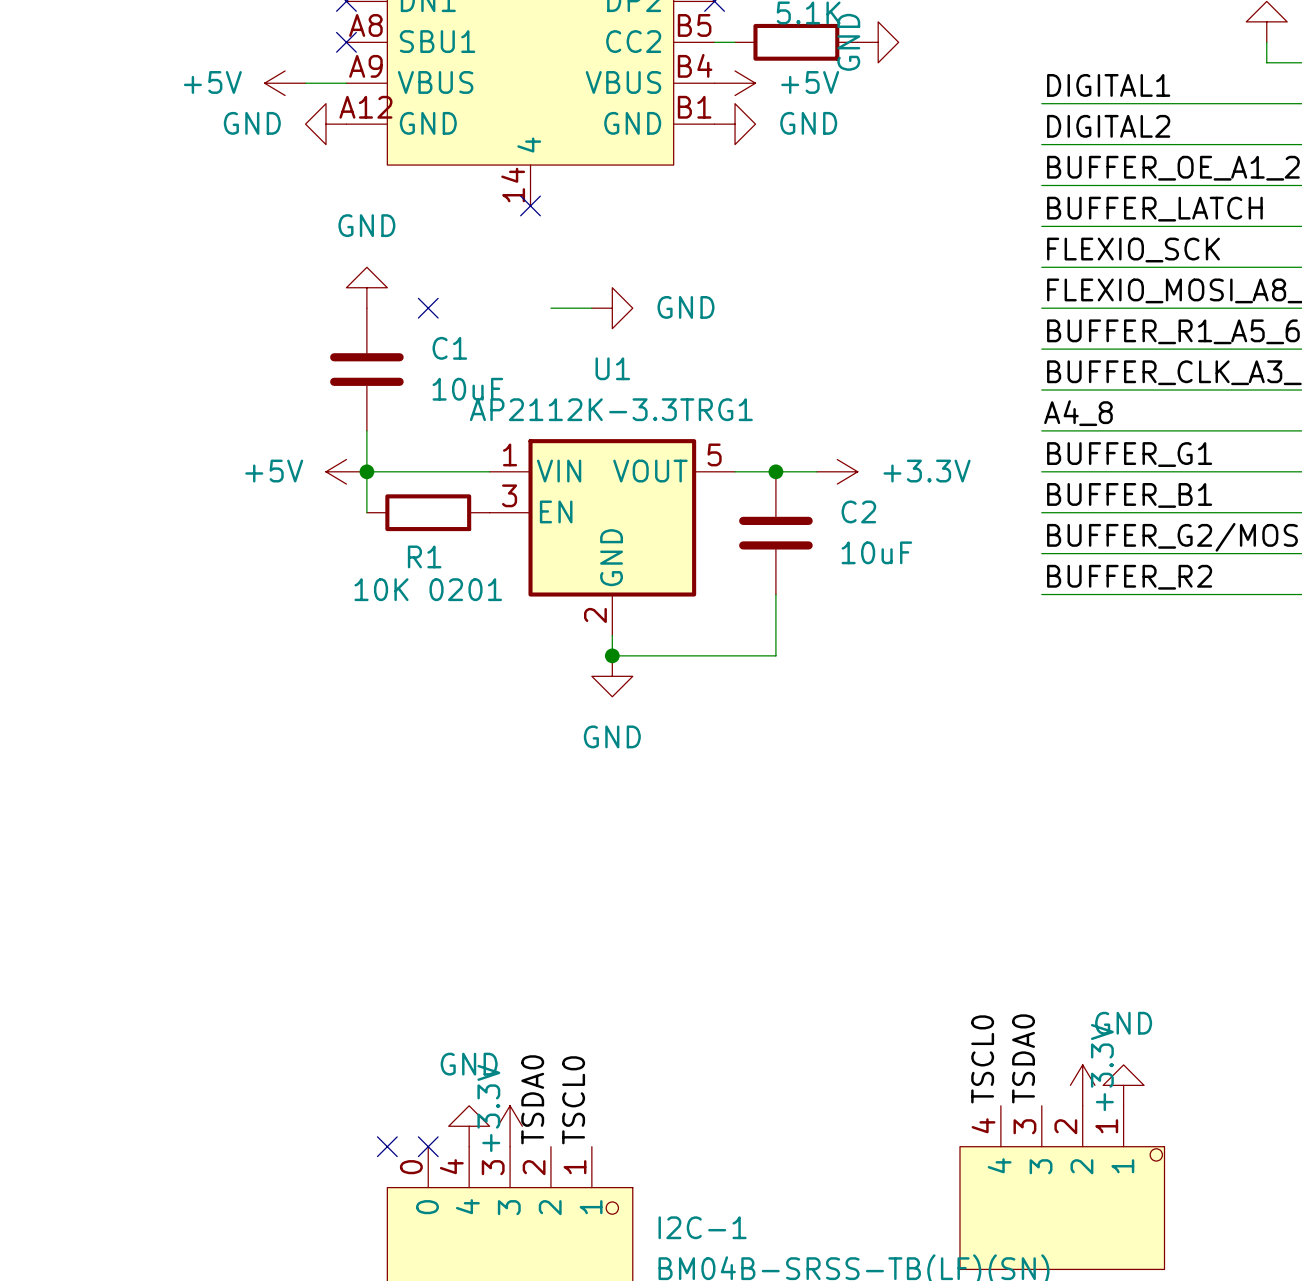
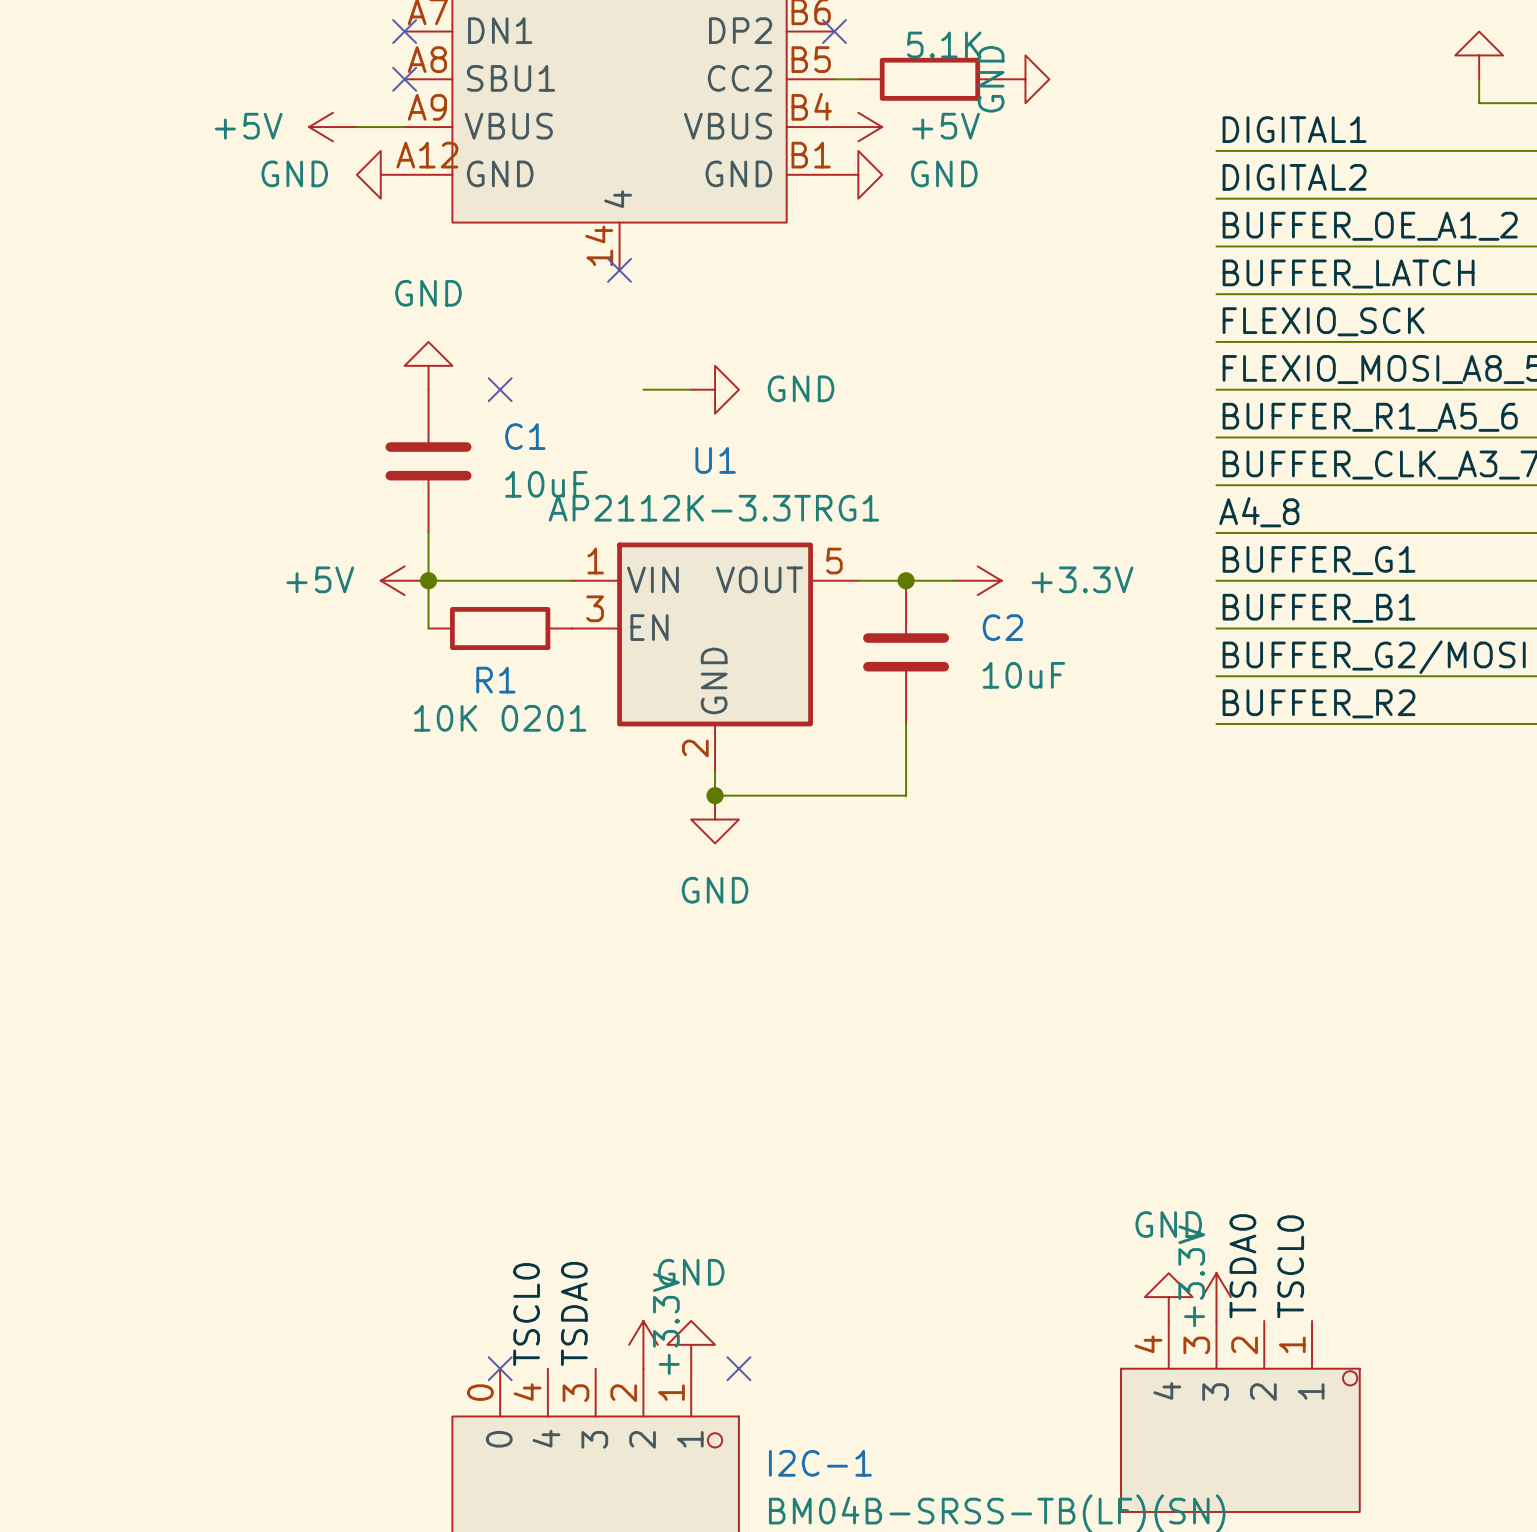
label position: TSDA0 (1023, 1058) -> TSDA0 (1242, 1266)
label position: TSCL0 (982, 1059) -> TSCL0 (1290, 1266)
power symbol text position: +3.3V (1102, 1067) -> +3.3V (1191, 1276)
power symbol position: +3.3V (1082, 1085) -> +3.3V (1216, 1297)
power symbol position: GND (1123, 1085) -> GND (1168, 1297)
label position: TSDA0 (532, 1099) -> TSDA0 (574, 1313)
label position: TSCL0 (573, 1100) -> TSCL0 (526, 1314)
power symbol text position: +3.3V (488, 1108) -> +3.3V (666, 1324)
power symbol position: GND (469, 1126) -> GND (691, 1344)
power symbol position: +3.3V (510, 1126) -> +3.3V (643, 1344)
no-connect mark: (387, 1146) -> none
no-connect mark: none -> (738, 1368)

